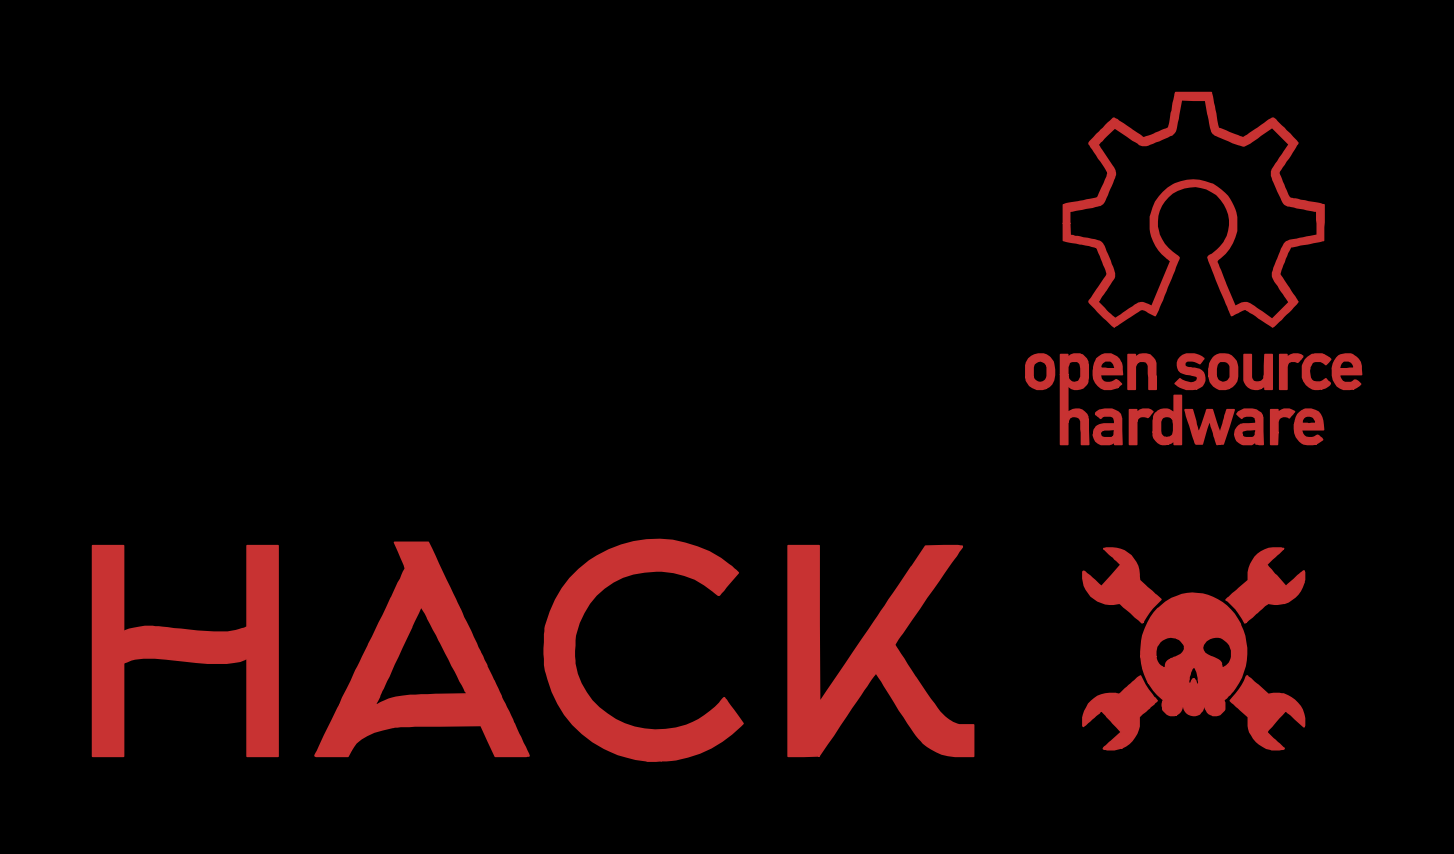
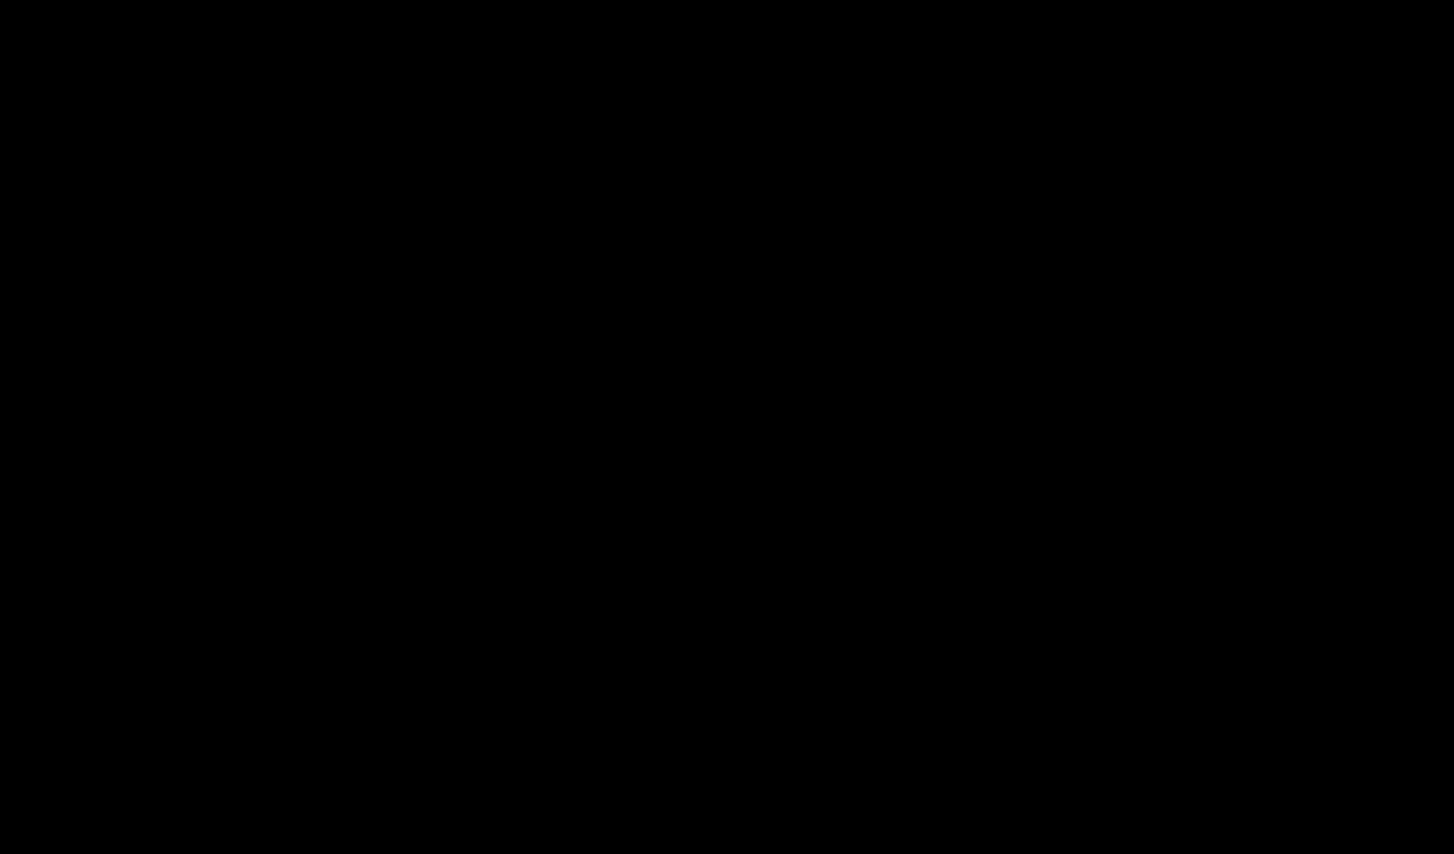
part: (1193, 268) -> none
part: (1193, 648) -> none
part: (533, 650) -> none

